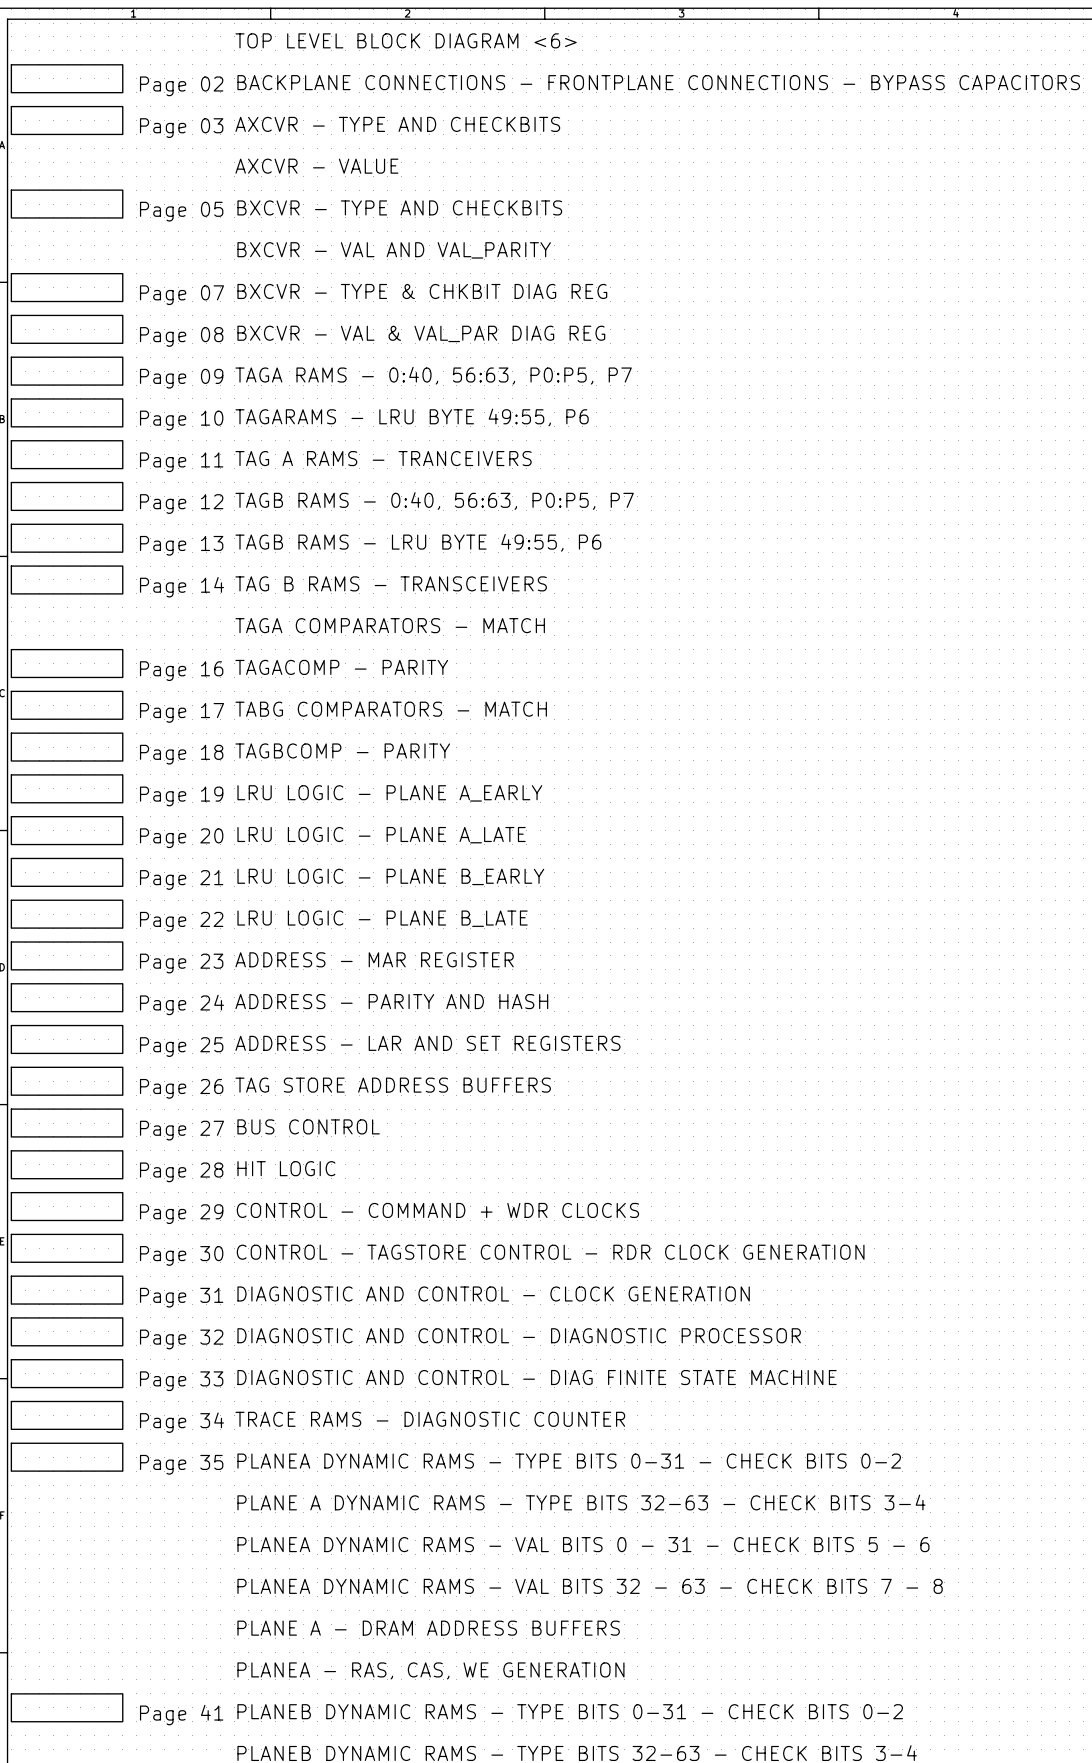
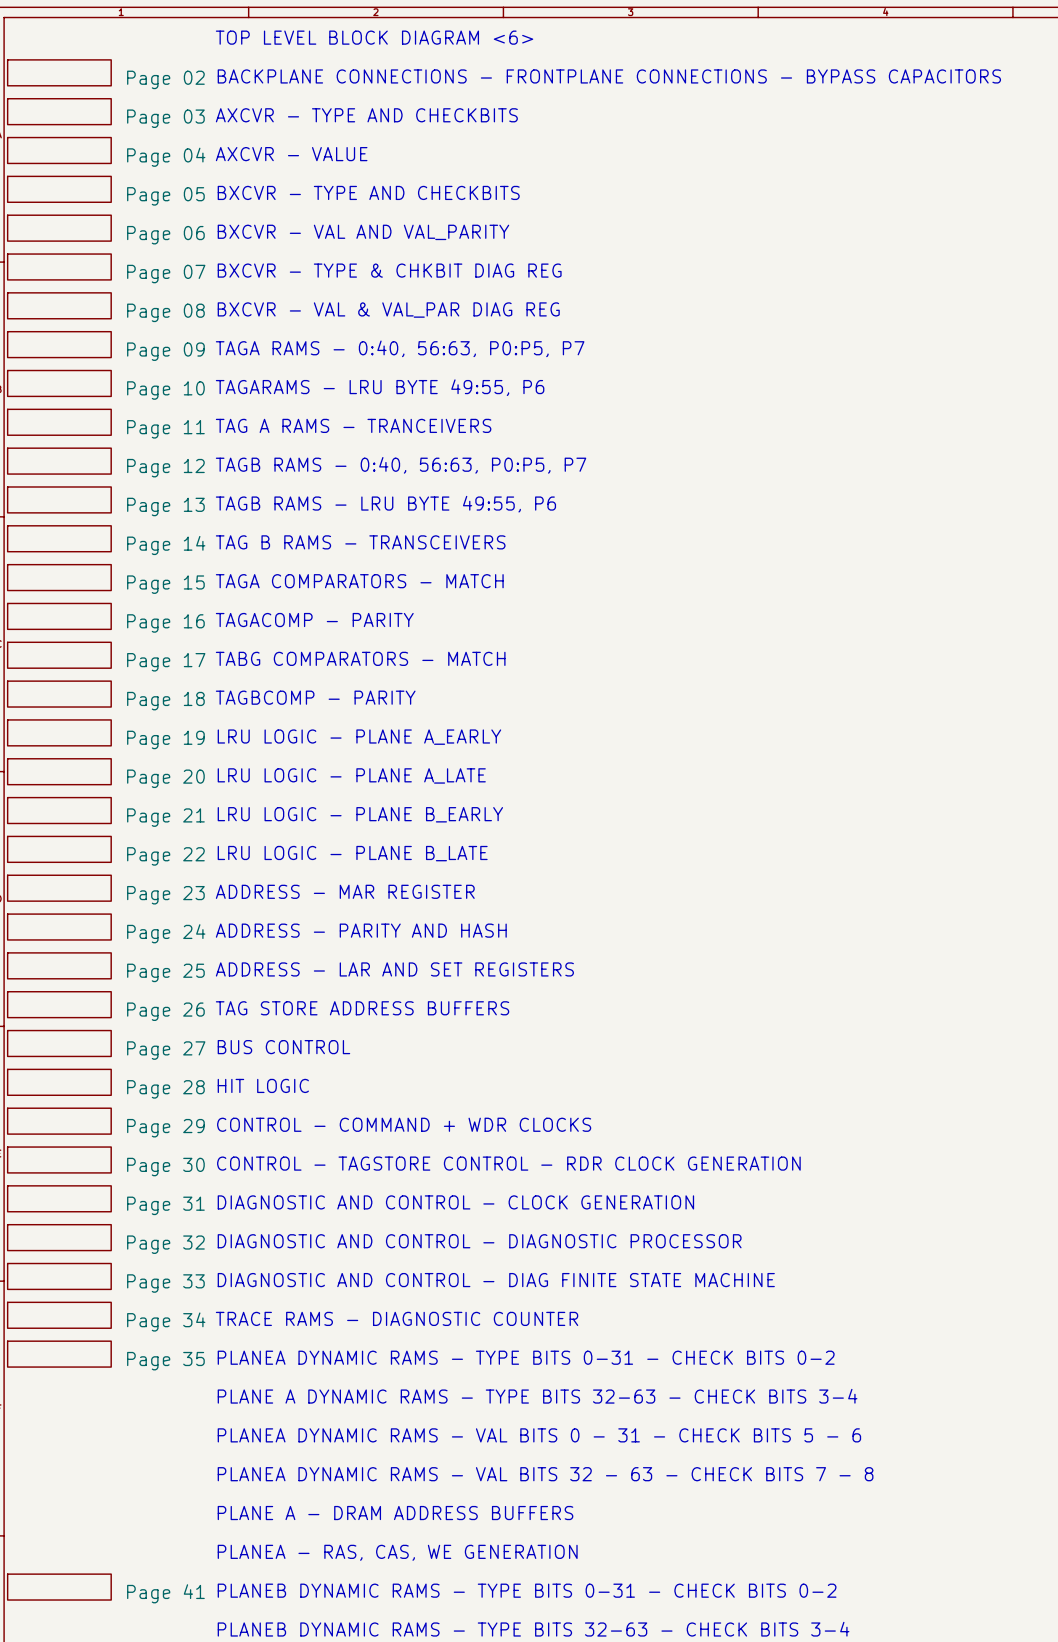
sheet Page 04: none -> (59, 150)
sheet Page 06: none -> (59, 228)
sheet Page 15: none -> (59, 577)

